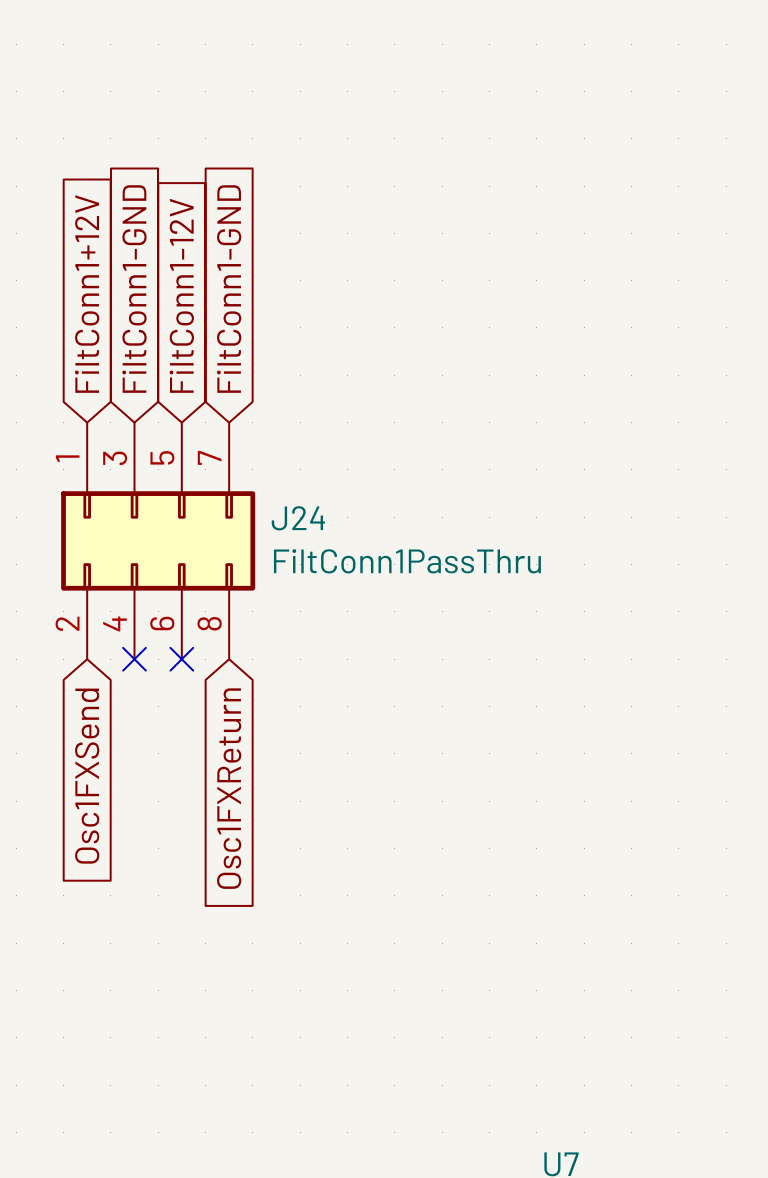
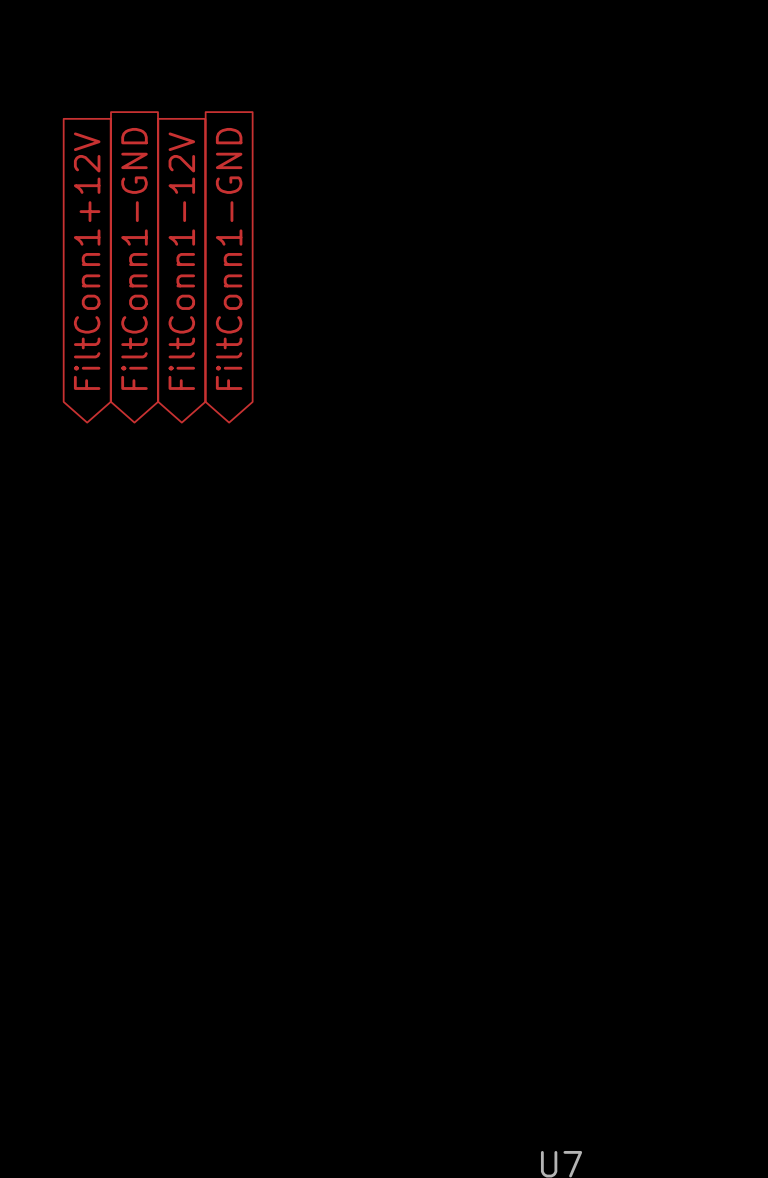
J24: FiltConn1PassThru (158, 540) -> none
no-connect mark: (134, 659) -> none
no-connect mark: (181, 659) -> none
global label: Osc1FXSend (87, 776) -> none
global label: Osc1FXReturn (229, 788) -> none

